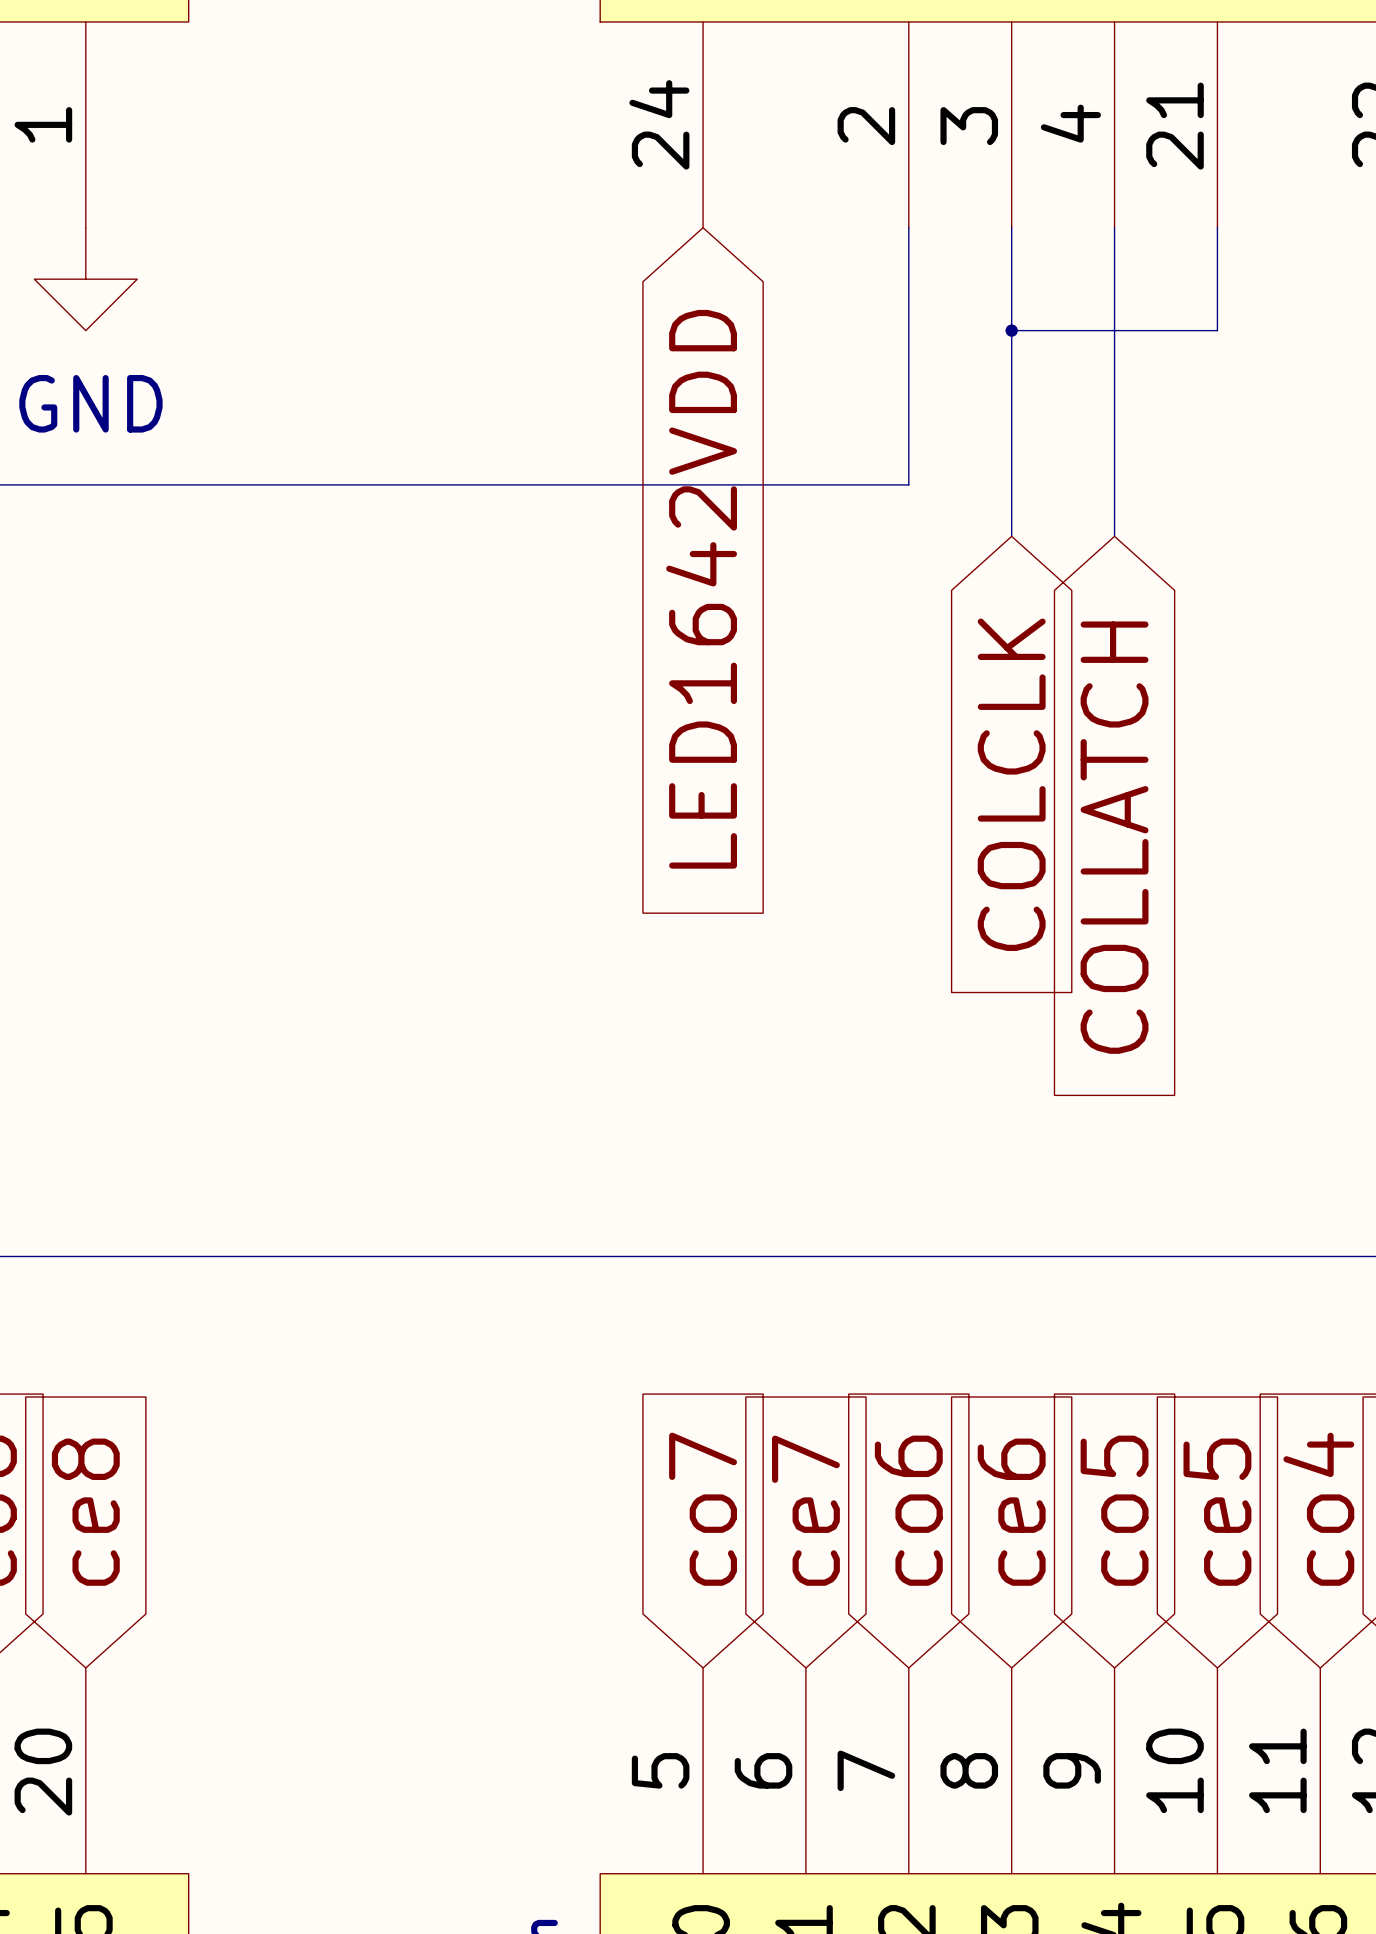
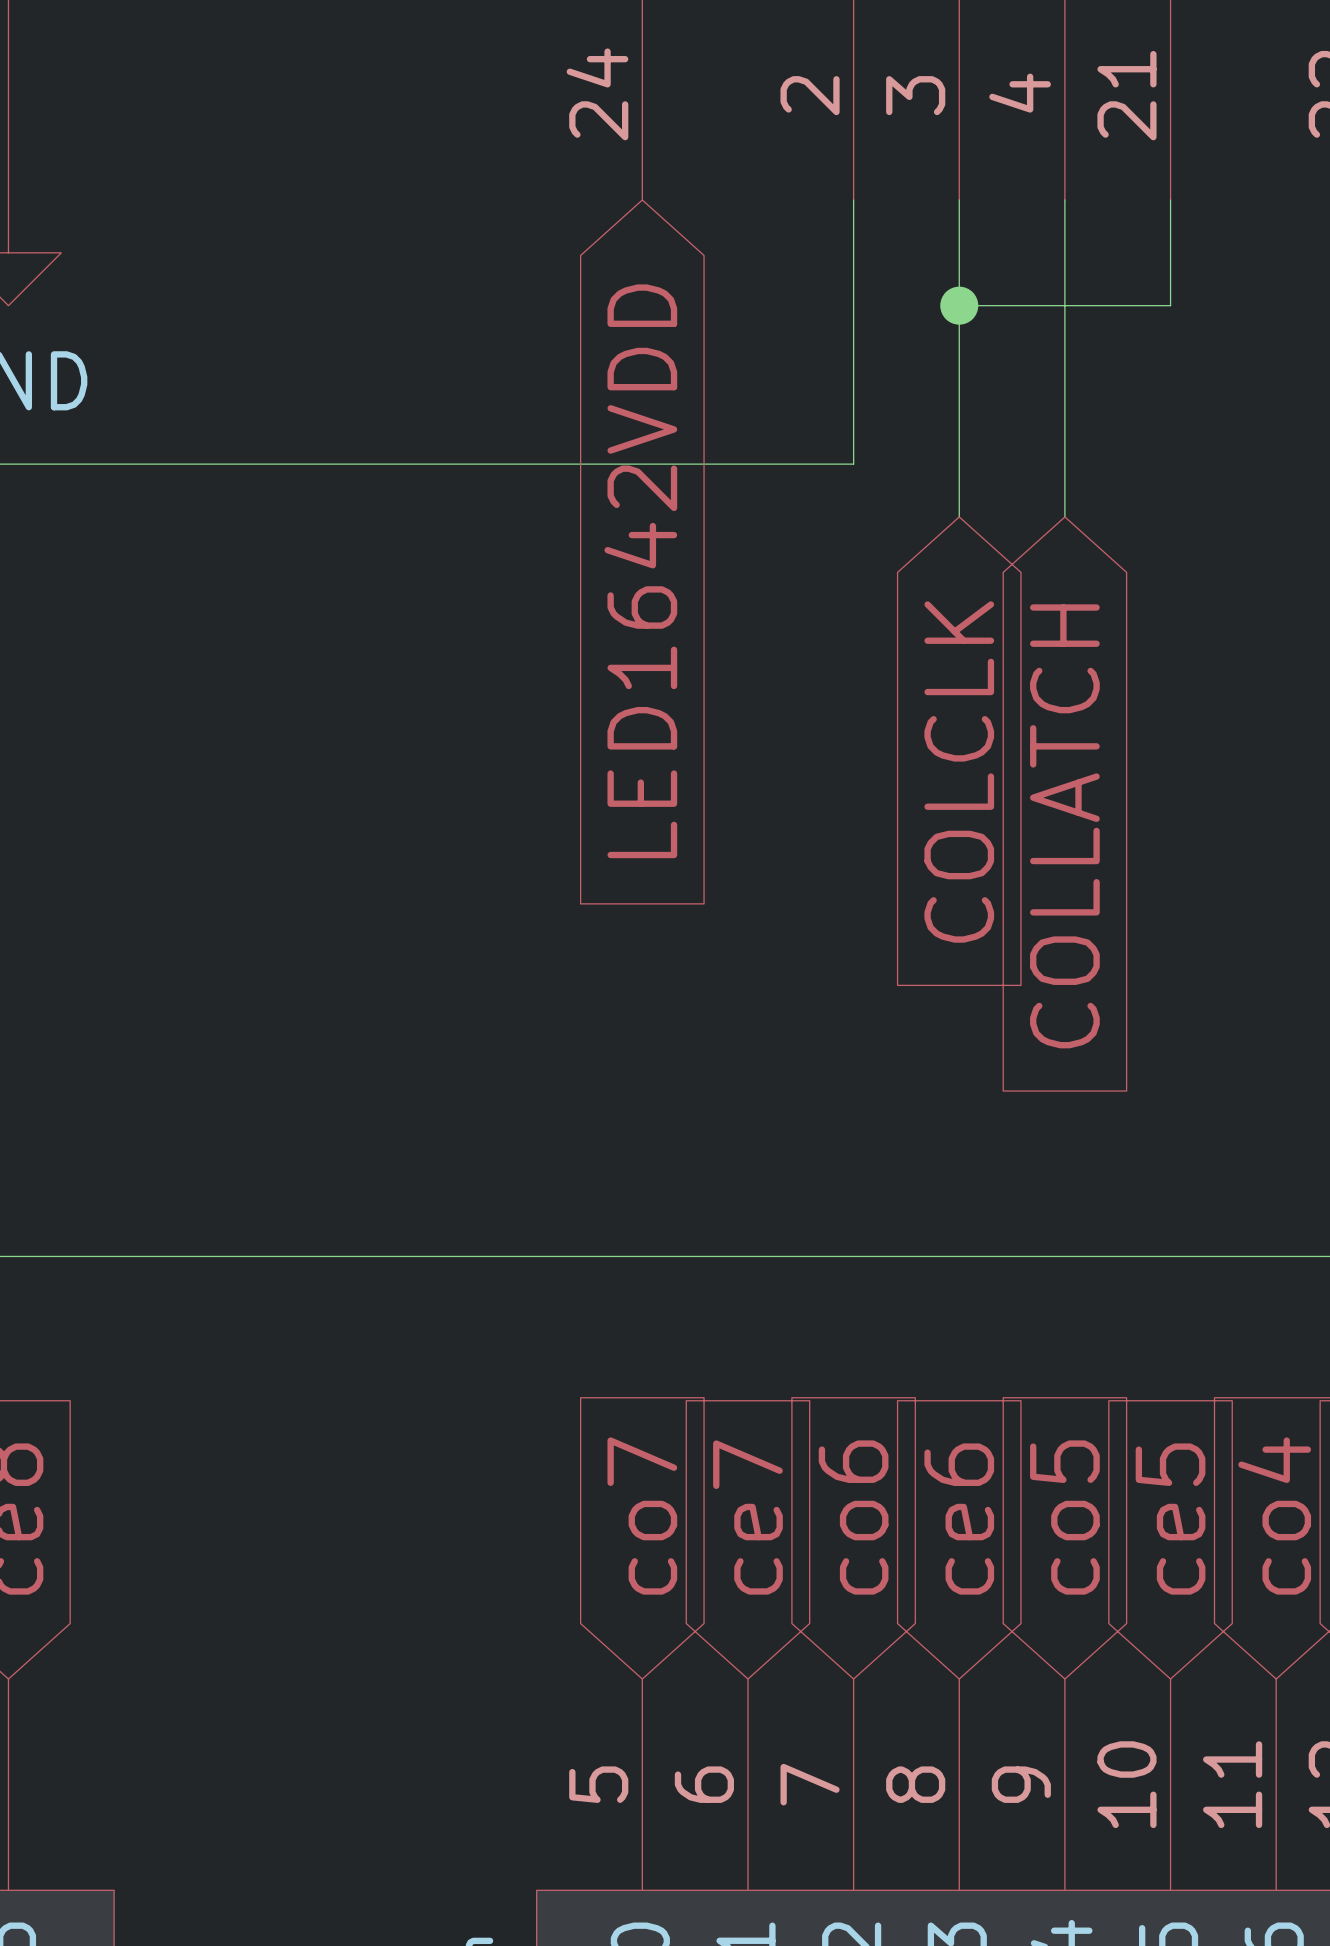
junction size: [1005, 324, 1018, 337] -> [940, 286, 979, 325]

